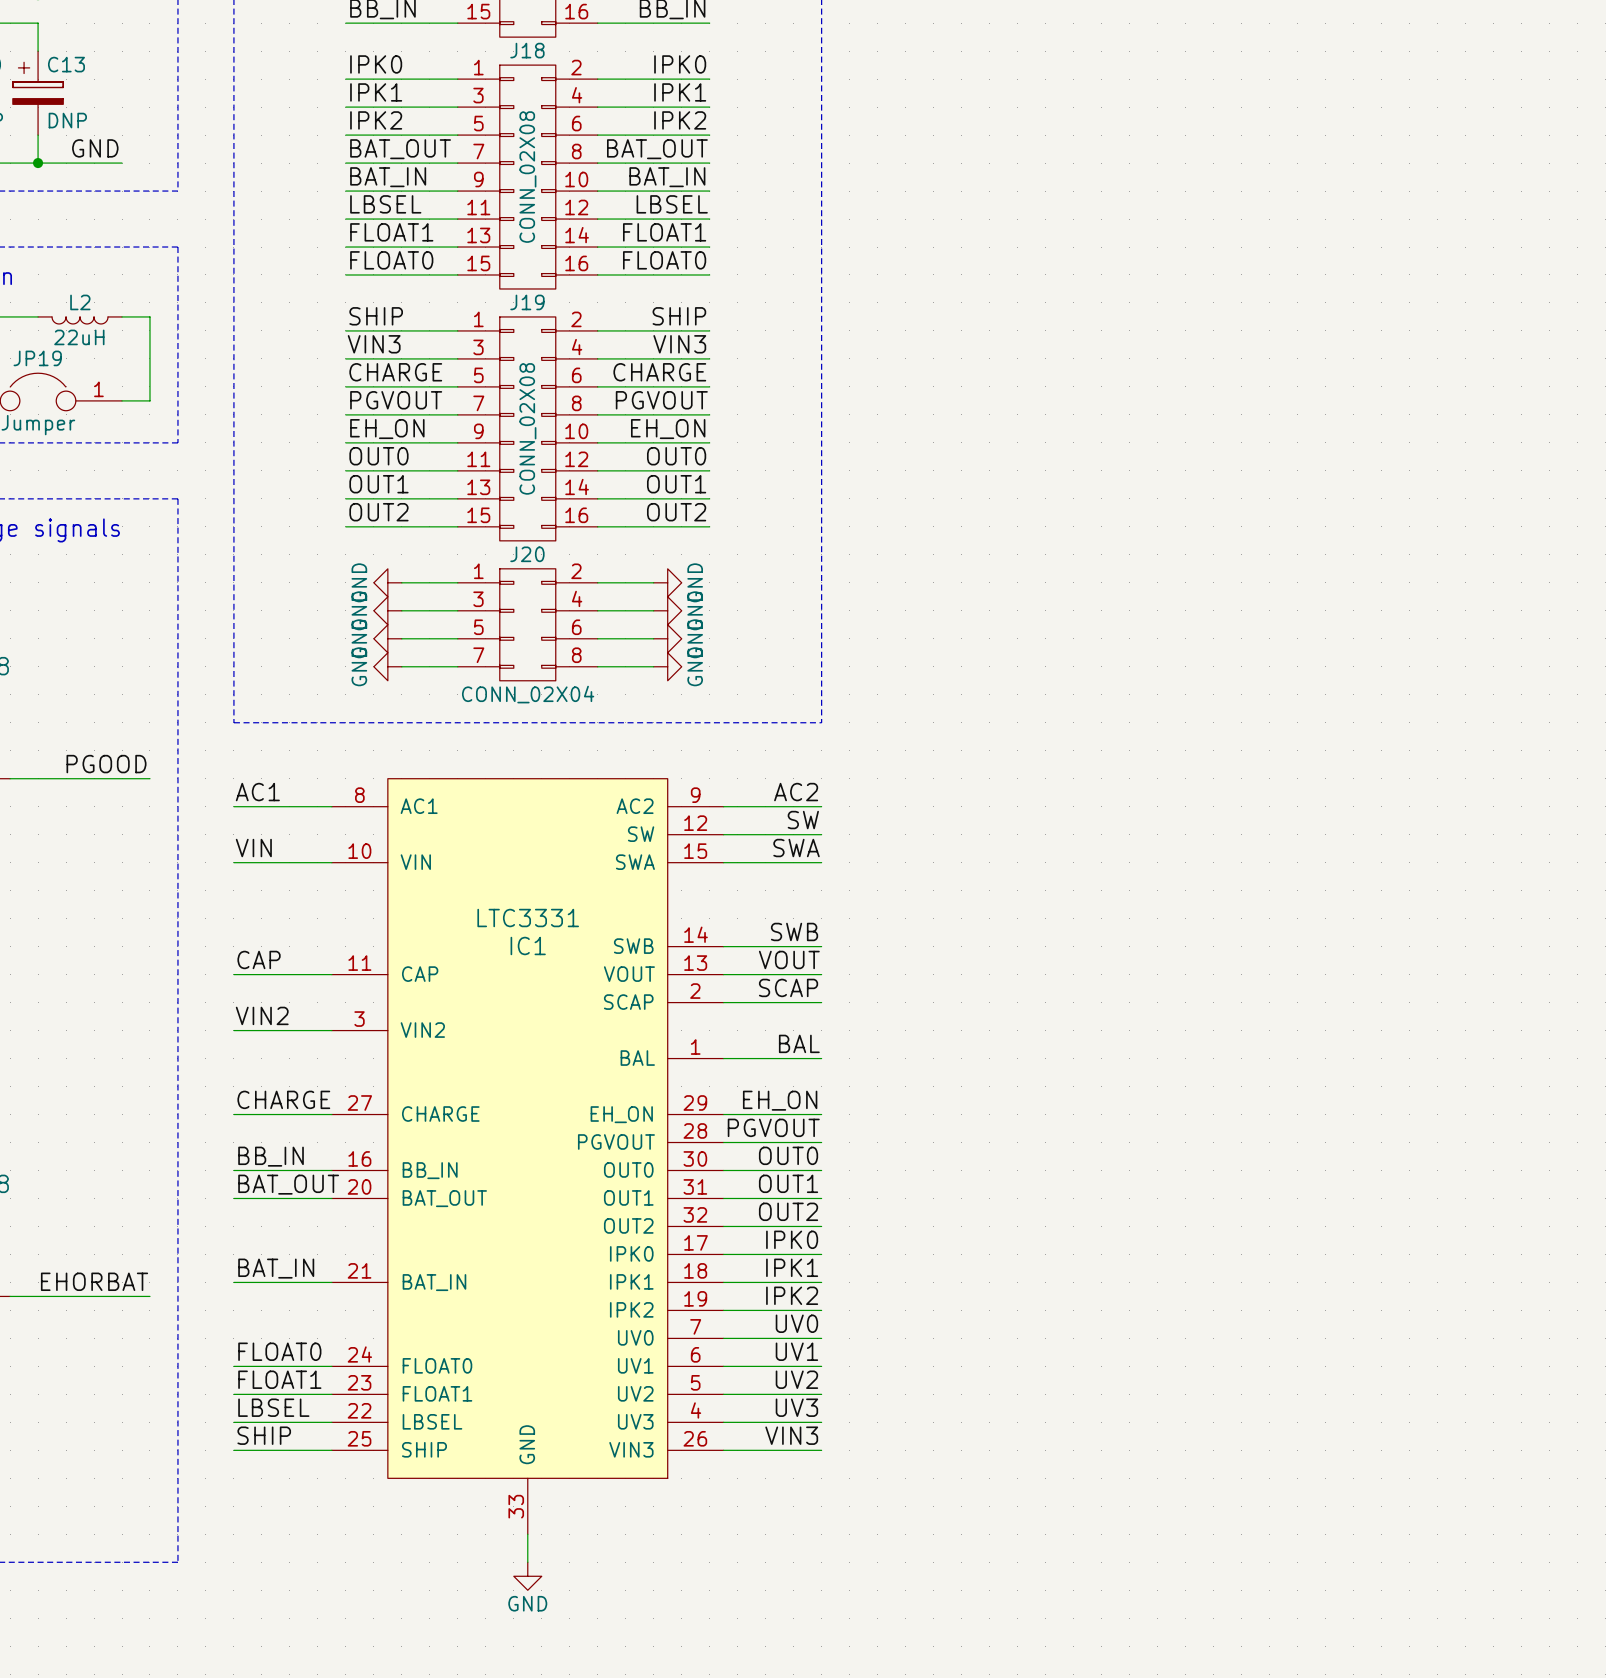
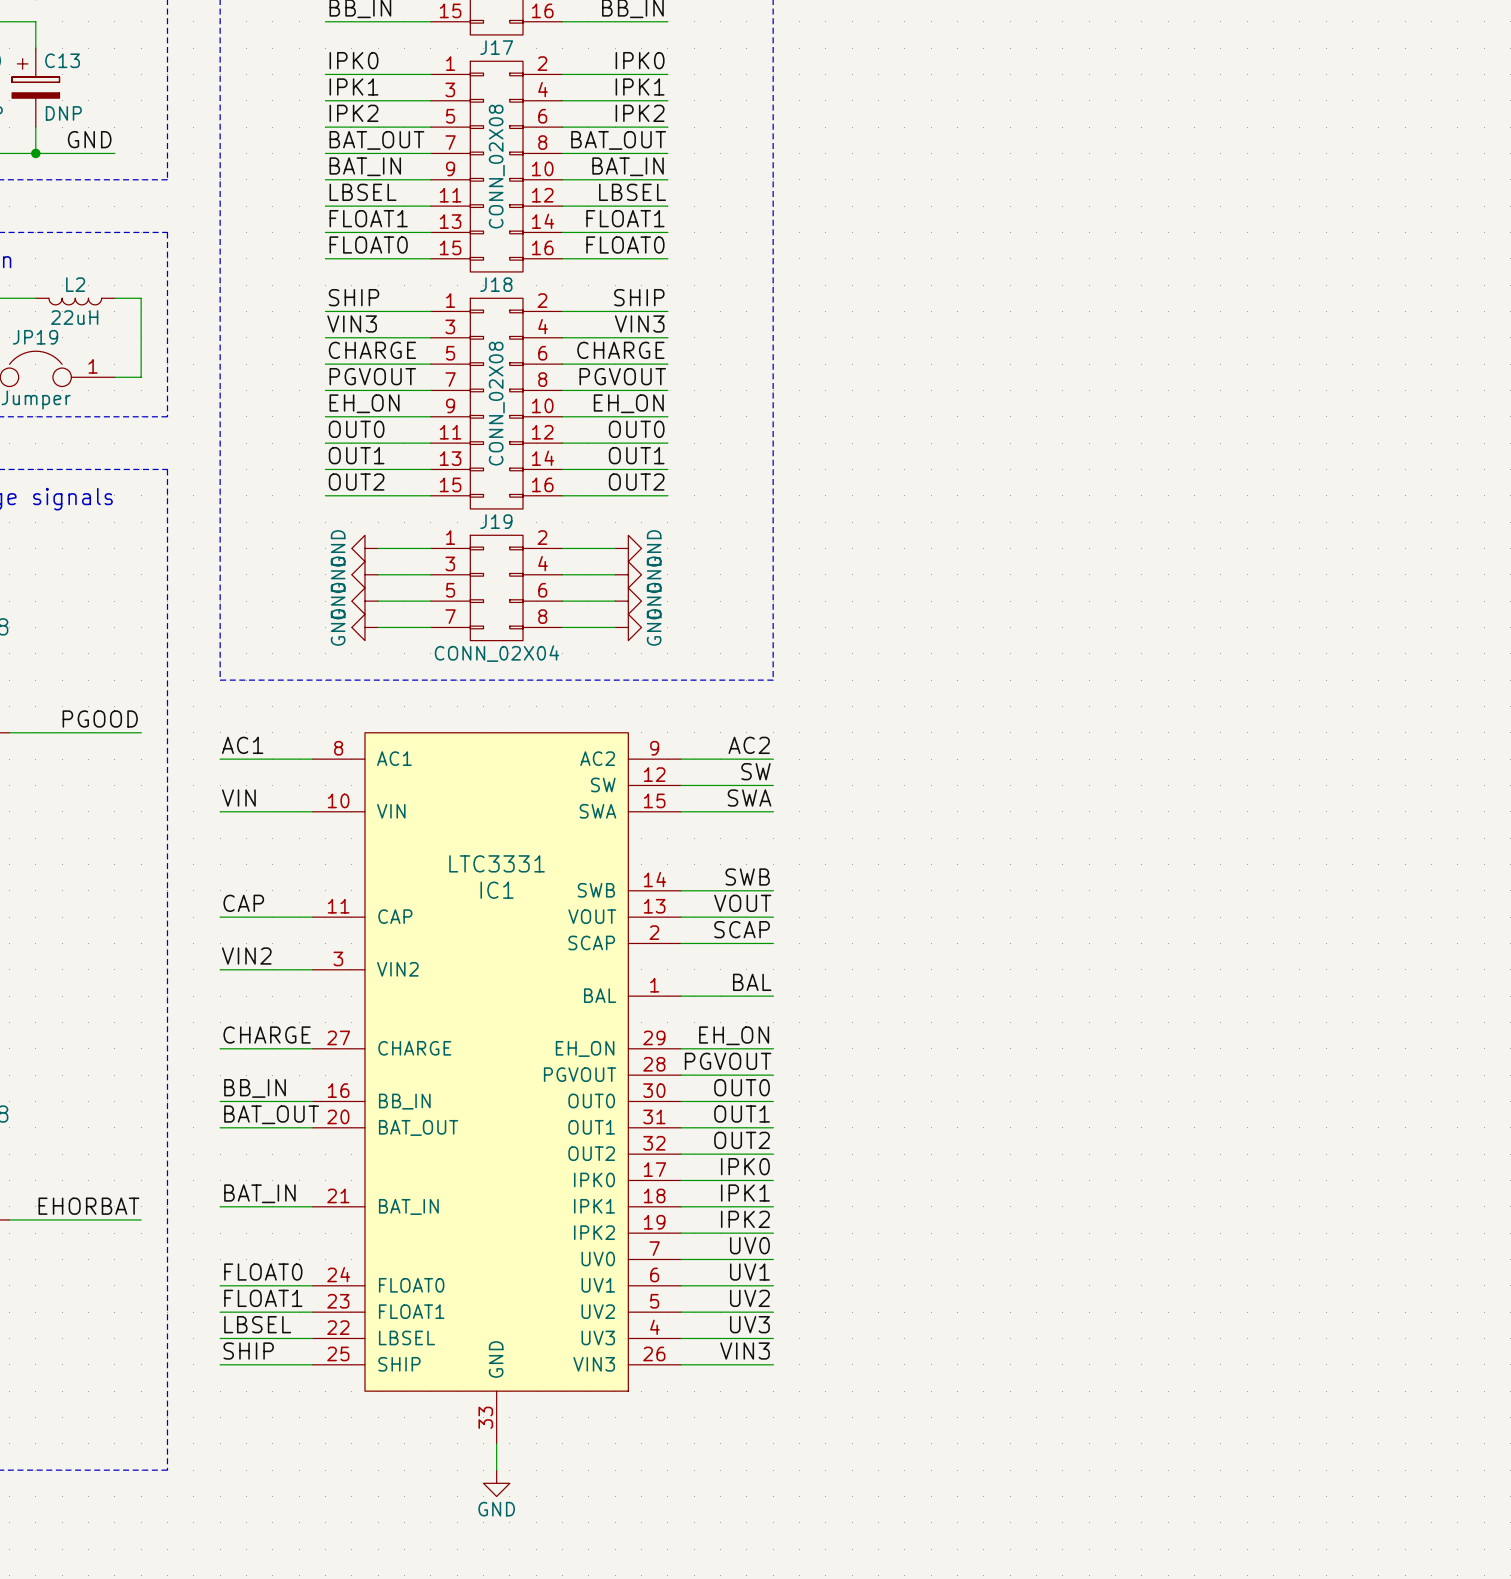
J18 name: J18 (527, 50) -> J17 (496, 47)
J19 name: J19 (527, 302) -> J18 (496, 284)
J20 name: J20 (527, 554) -> J19 (496, 521)

